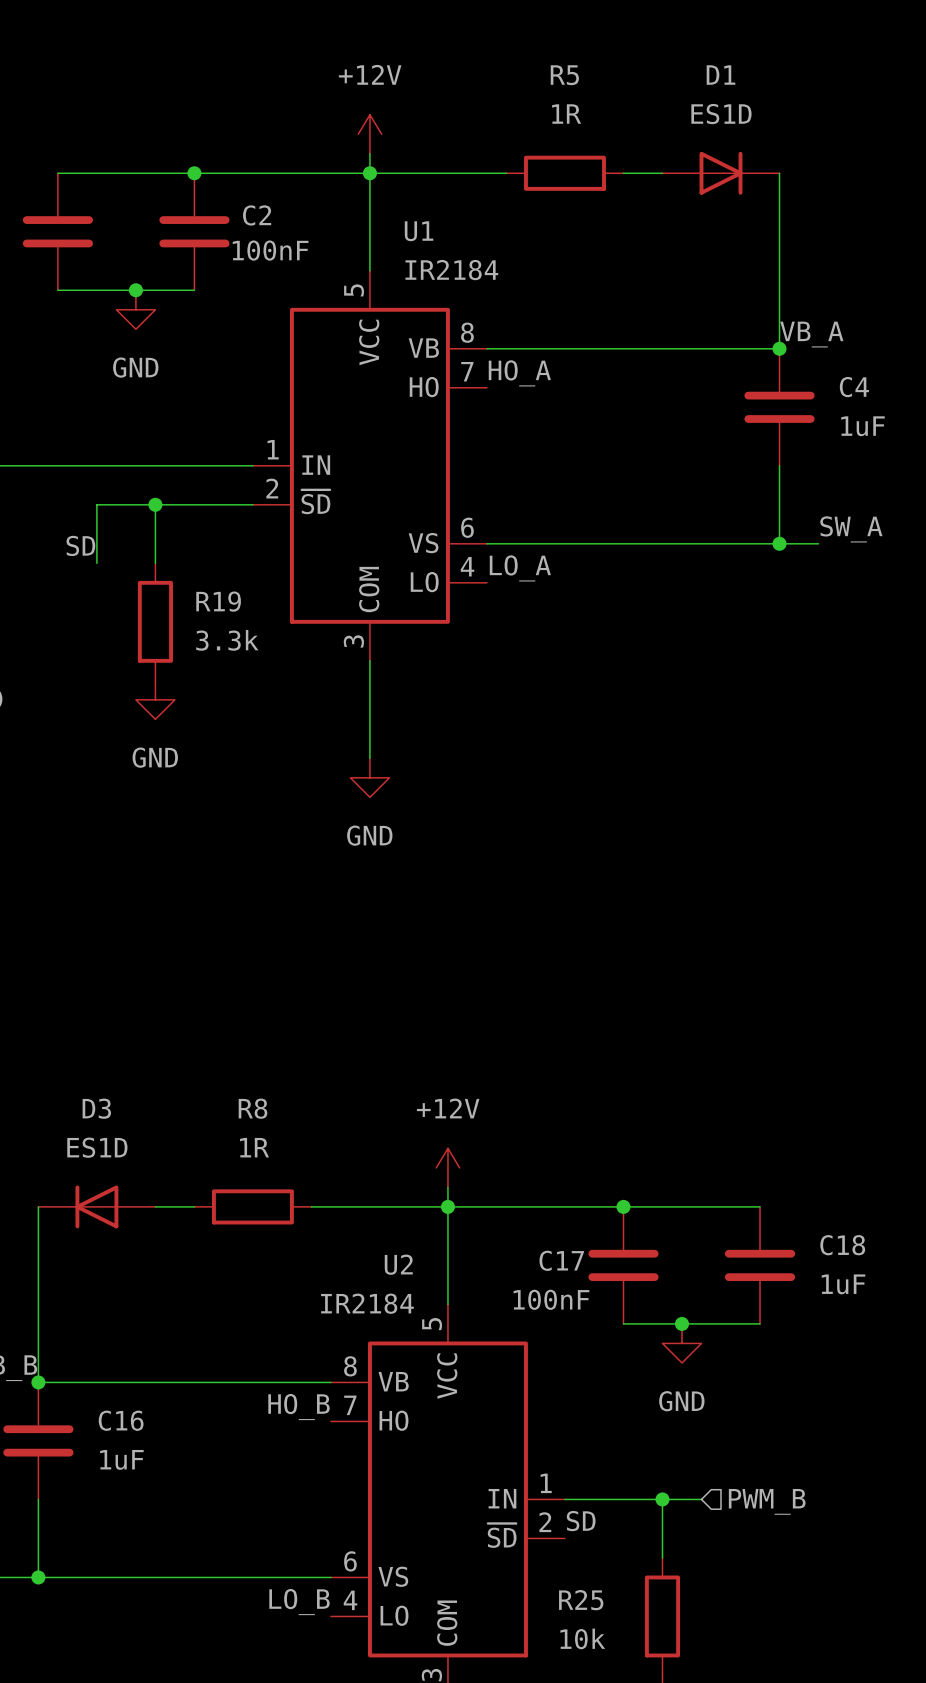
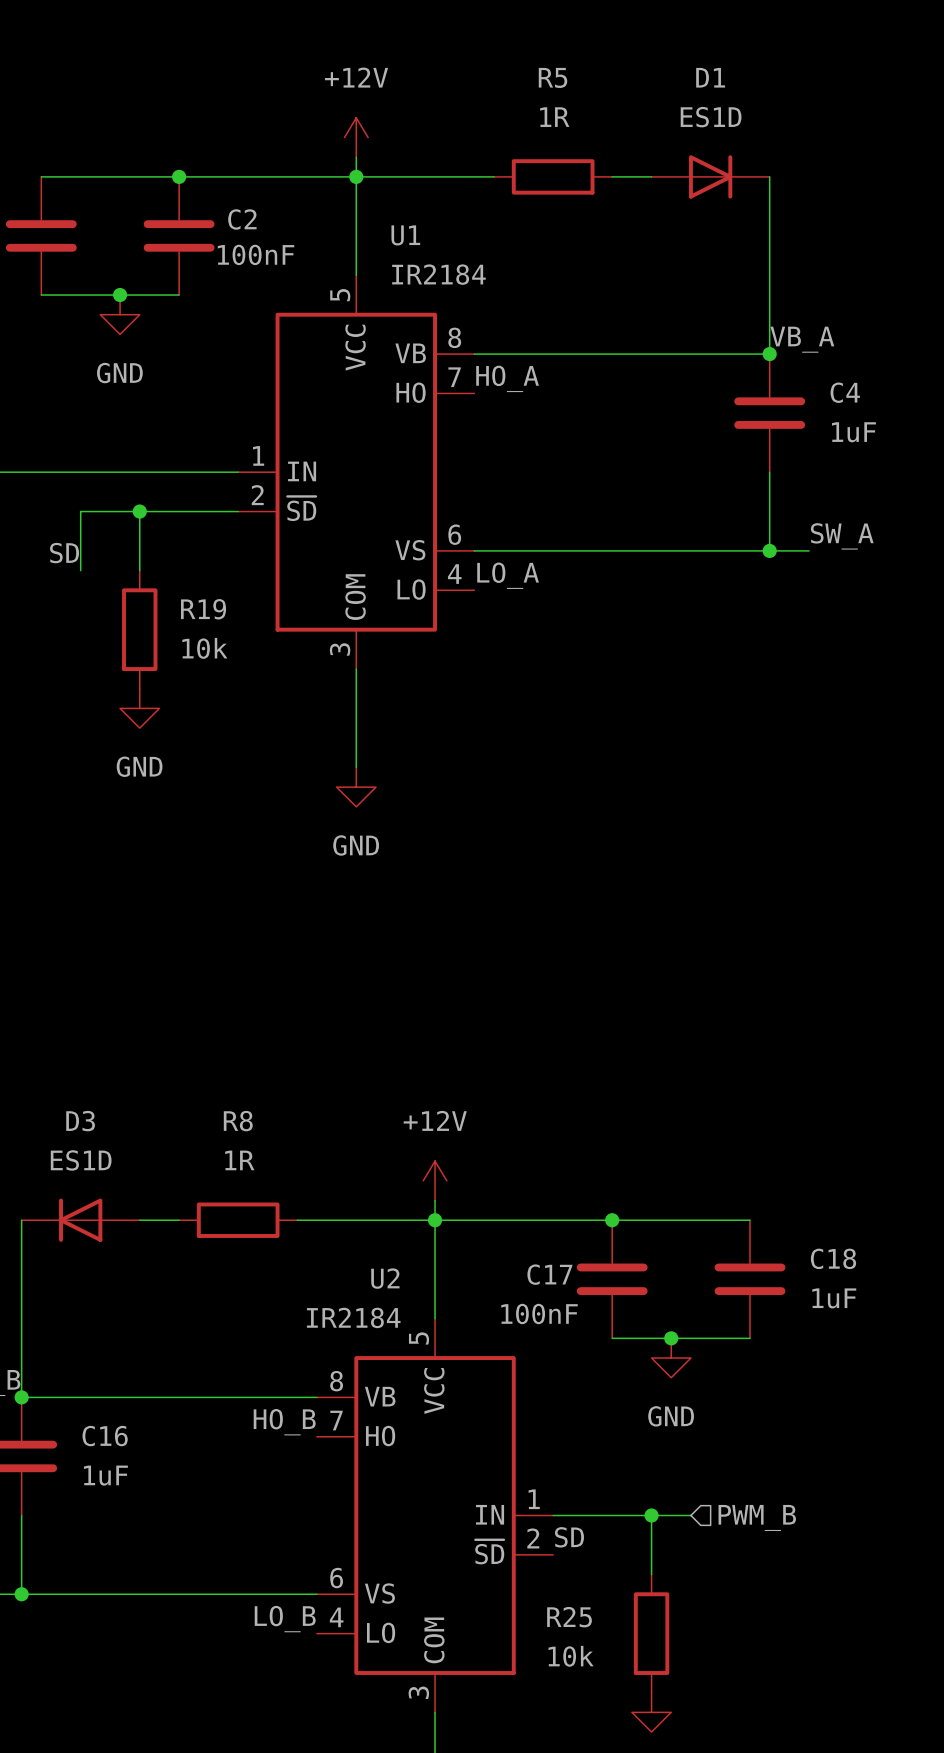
R19 value: 3.3k (227, 640) -> 10k (204, 648)

